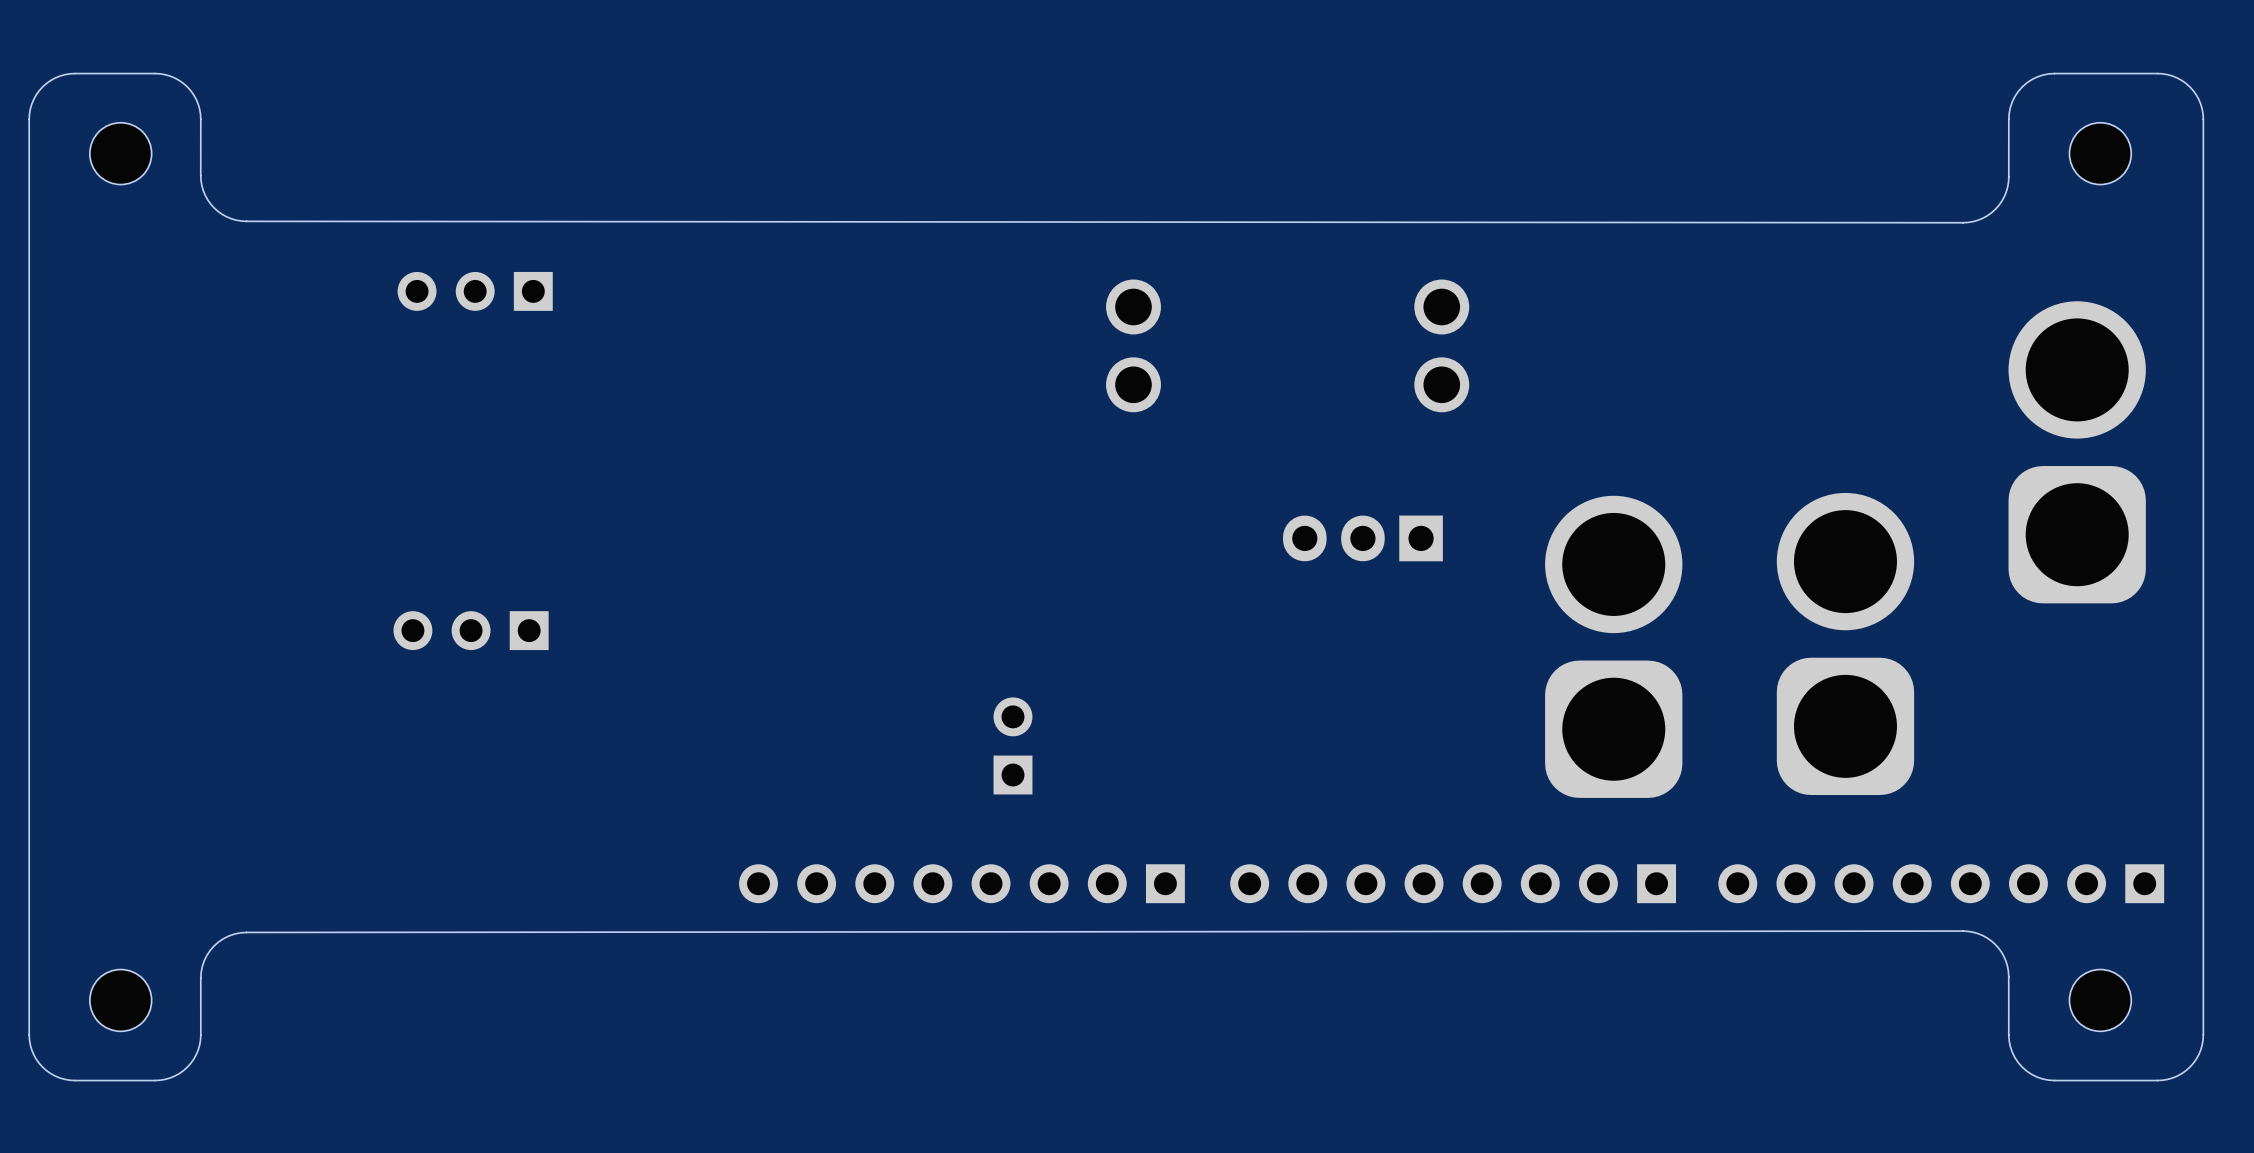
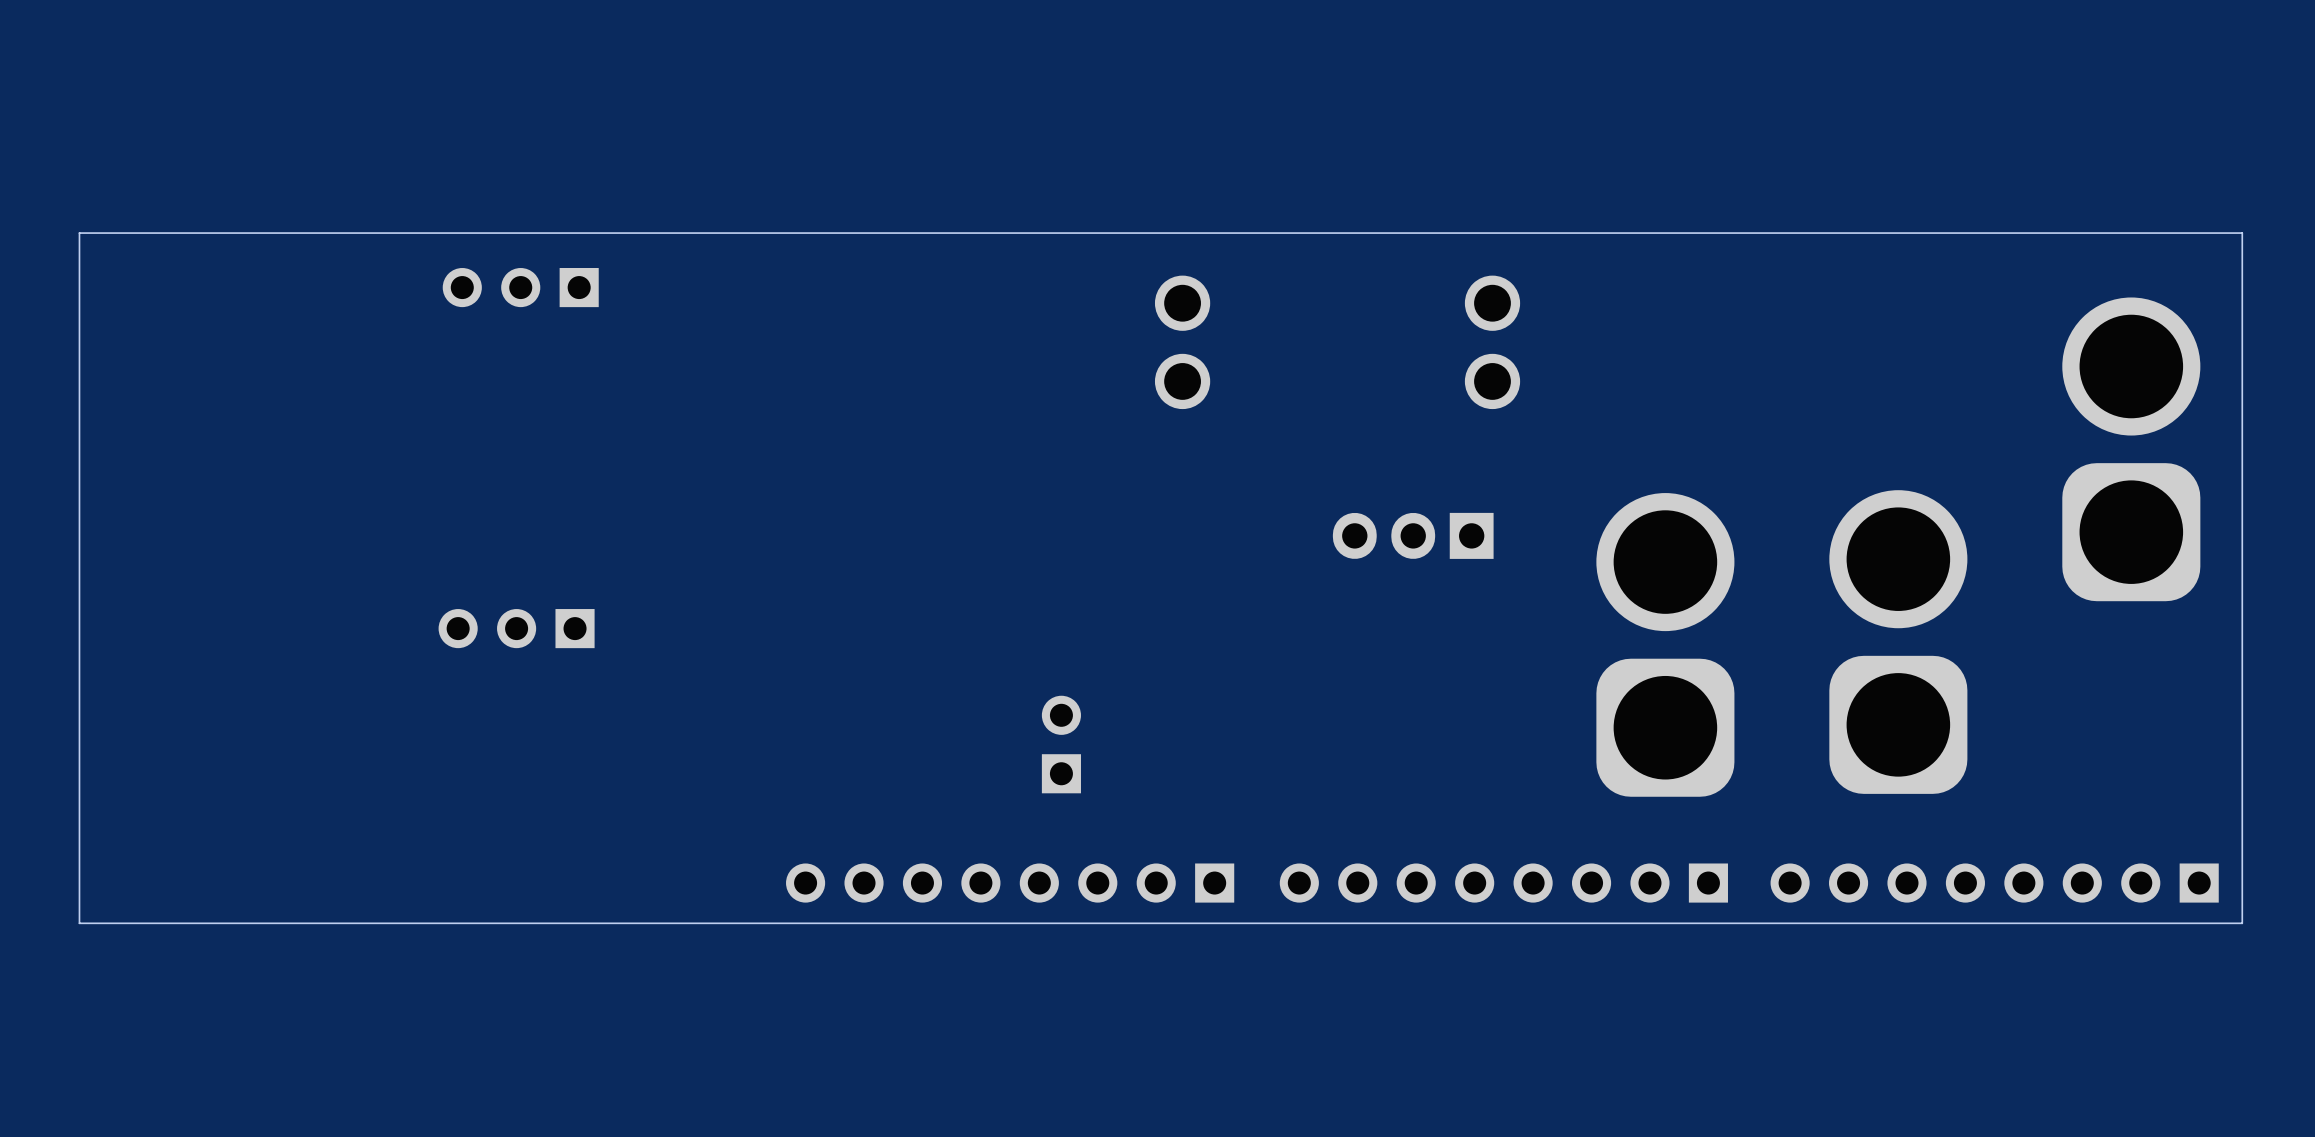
board edge: (2157, 73) (2048, 73) (2037, 77) (2026, 83) (2014, 96) (2009, 113) (2008, 182) (2004, 196) (1995, 209) (1987, 215) (1978, 220) (1962, 222) (241, 221) (222, 214) (214, 207) (205, 195) (201, 180) (199, 109) (193, 94) (183, 83) (170, 76) (155, 73) (74, 73) (55, 78) (46, 83) (36, 94) (31, 104) (29, 119) (29, 1034) (33, 1054) (46, 1070) (55, 1076) (69, 1080) (160, 1080) (179, 1073) (190, 1063) (199, 1044) (200, 978) (204, 960) (210, 950) (218, 941) (234, 934) (246, 932) (1962, 931) (1978, 933) (1987, 938) (1998, 948) (2004, 956) (2008, 971) (2009, 1040) (2014, 1057) (2026, 1071) (2037, 1077) (2054, 1080) (2157, 1080) (2177, 1076) (2186, 1070) (2196, 1059) (2200, 1049) (2203, 1034) (2203, 119) (2198, 99) (2189, 86) (2172, 76) (2157, 73) -> (2242, 233) (2242, 923) (79, 923) (79, 233) (2242, 233)
part: (120, 153) -> none
part: (2100, 153) -> none
part: (120, 1000) -> none
part: (2100, 1000) -> none

